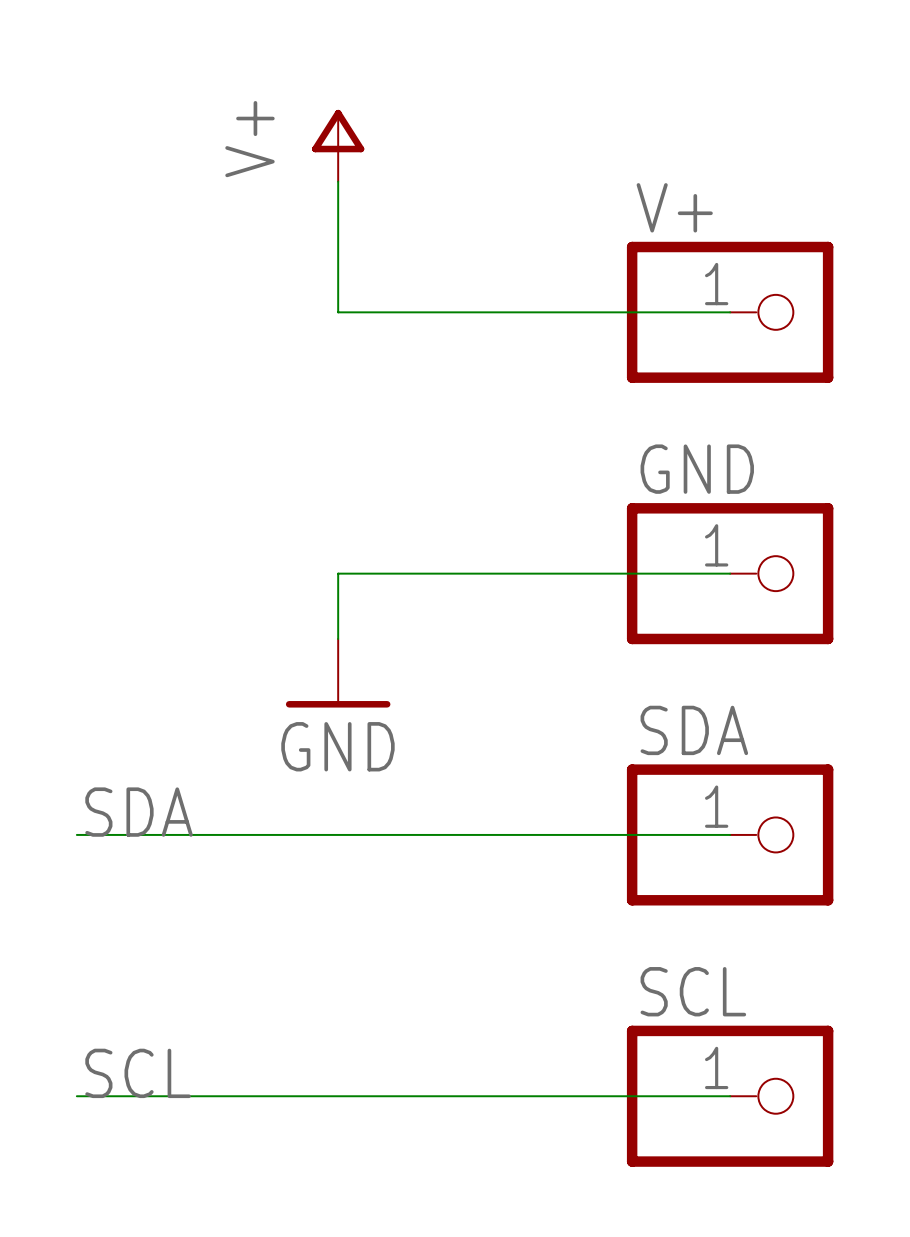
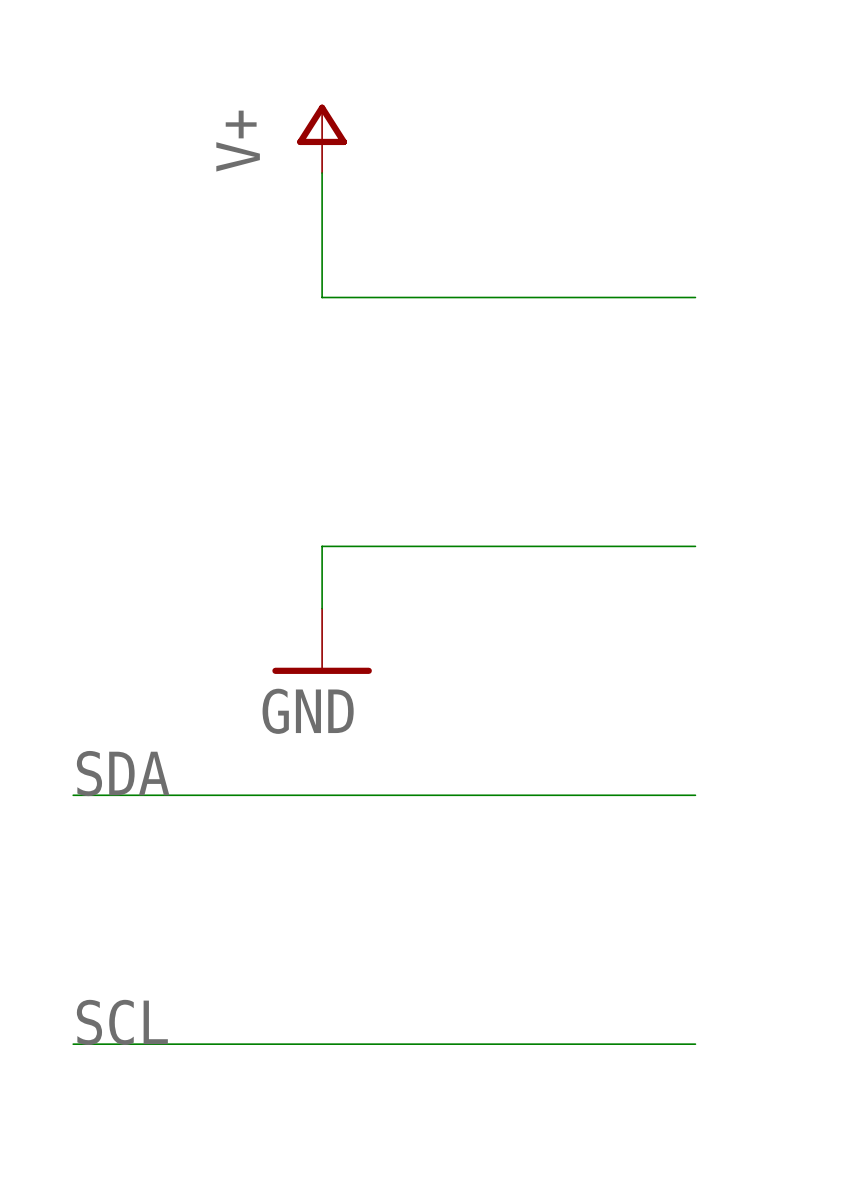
V+: (730, 312) -> none
GND: (730, 573) -> none
SDA: (730, 834) -> none
SCL: (730, 1096) -> none

